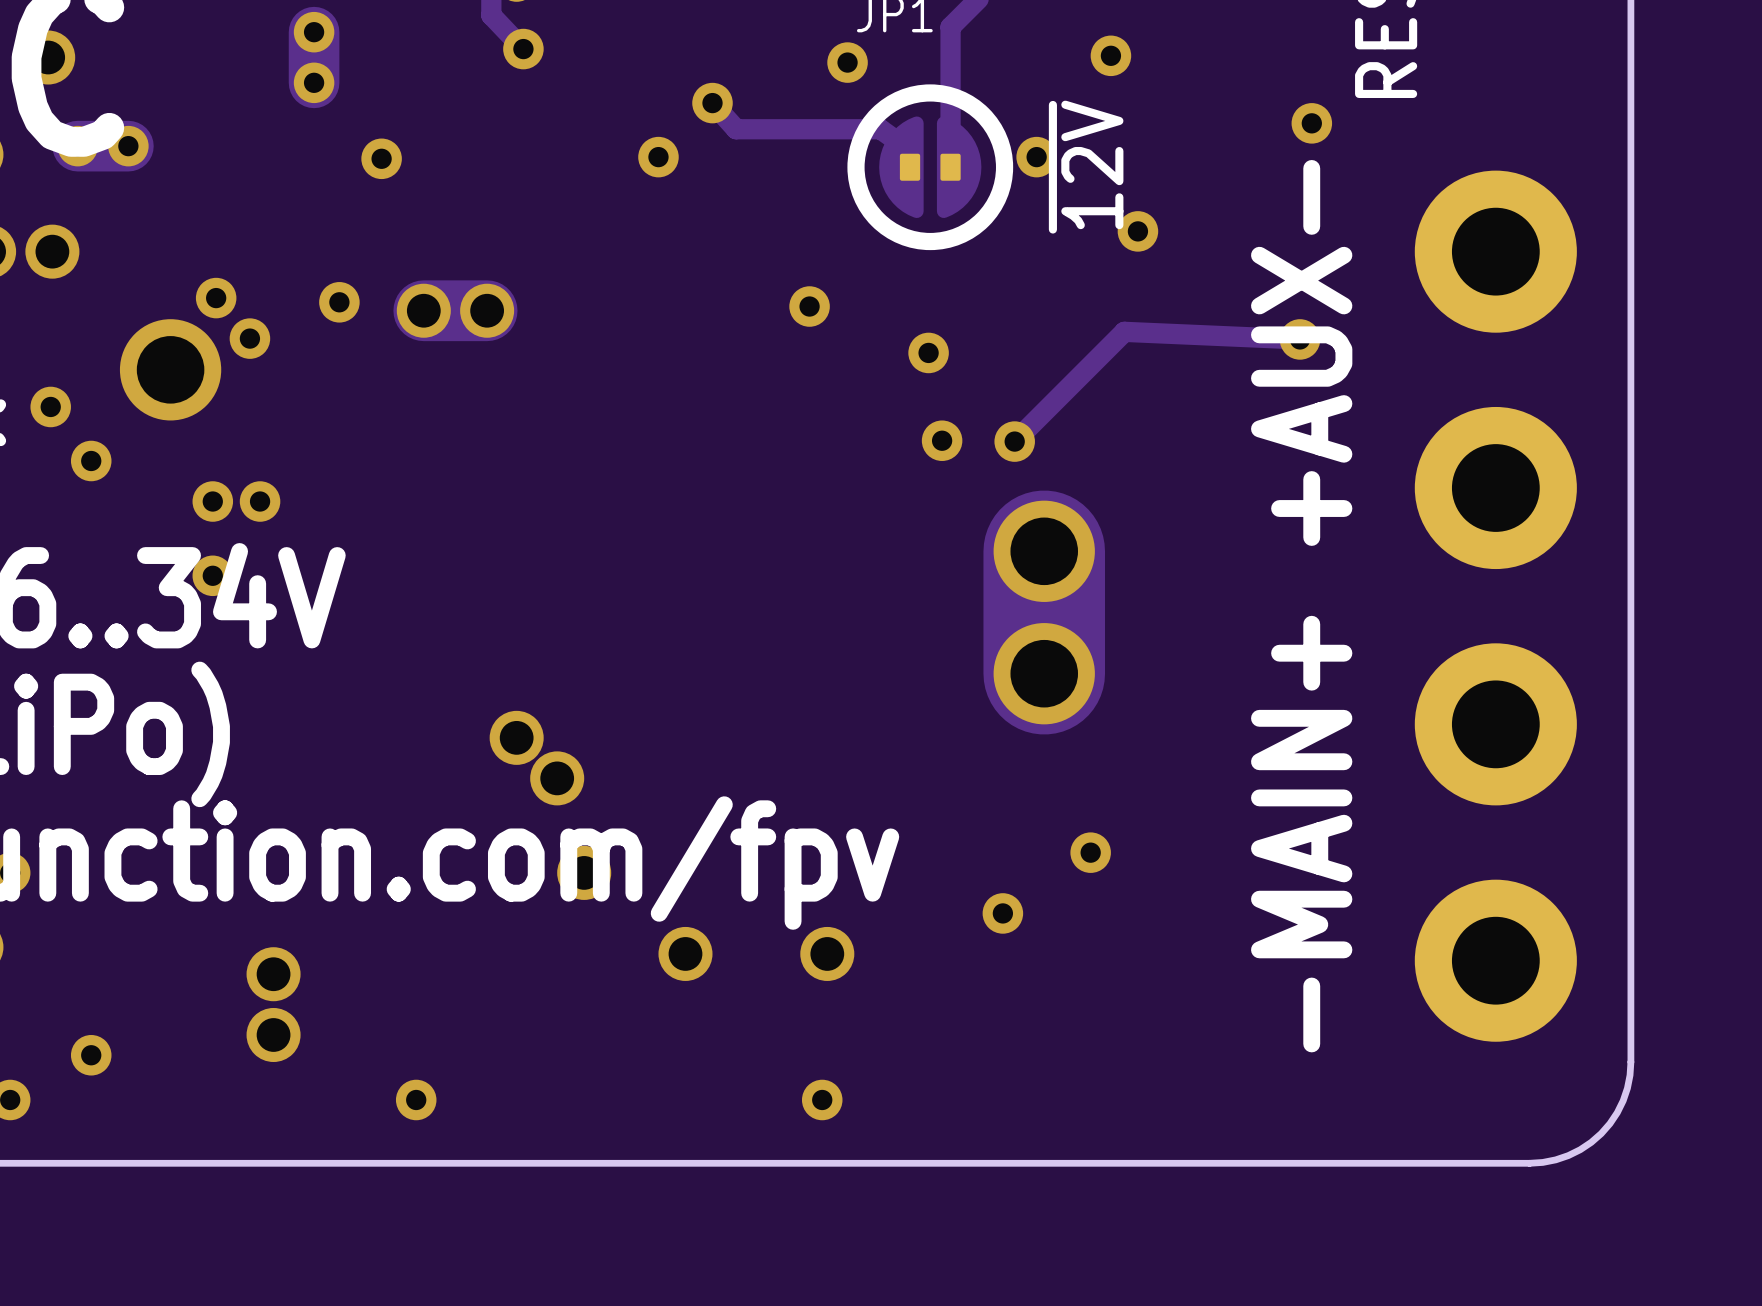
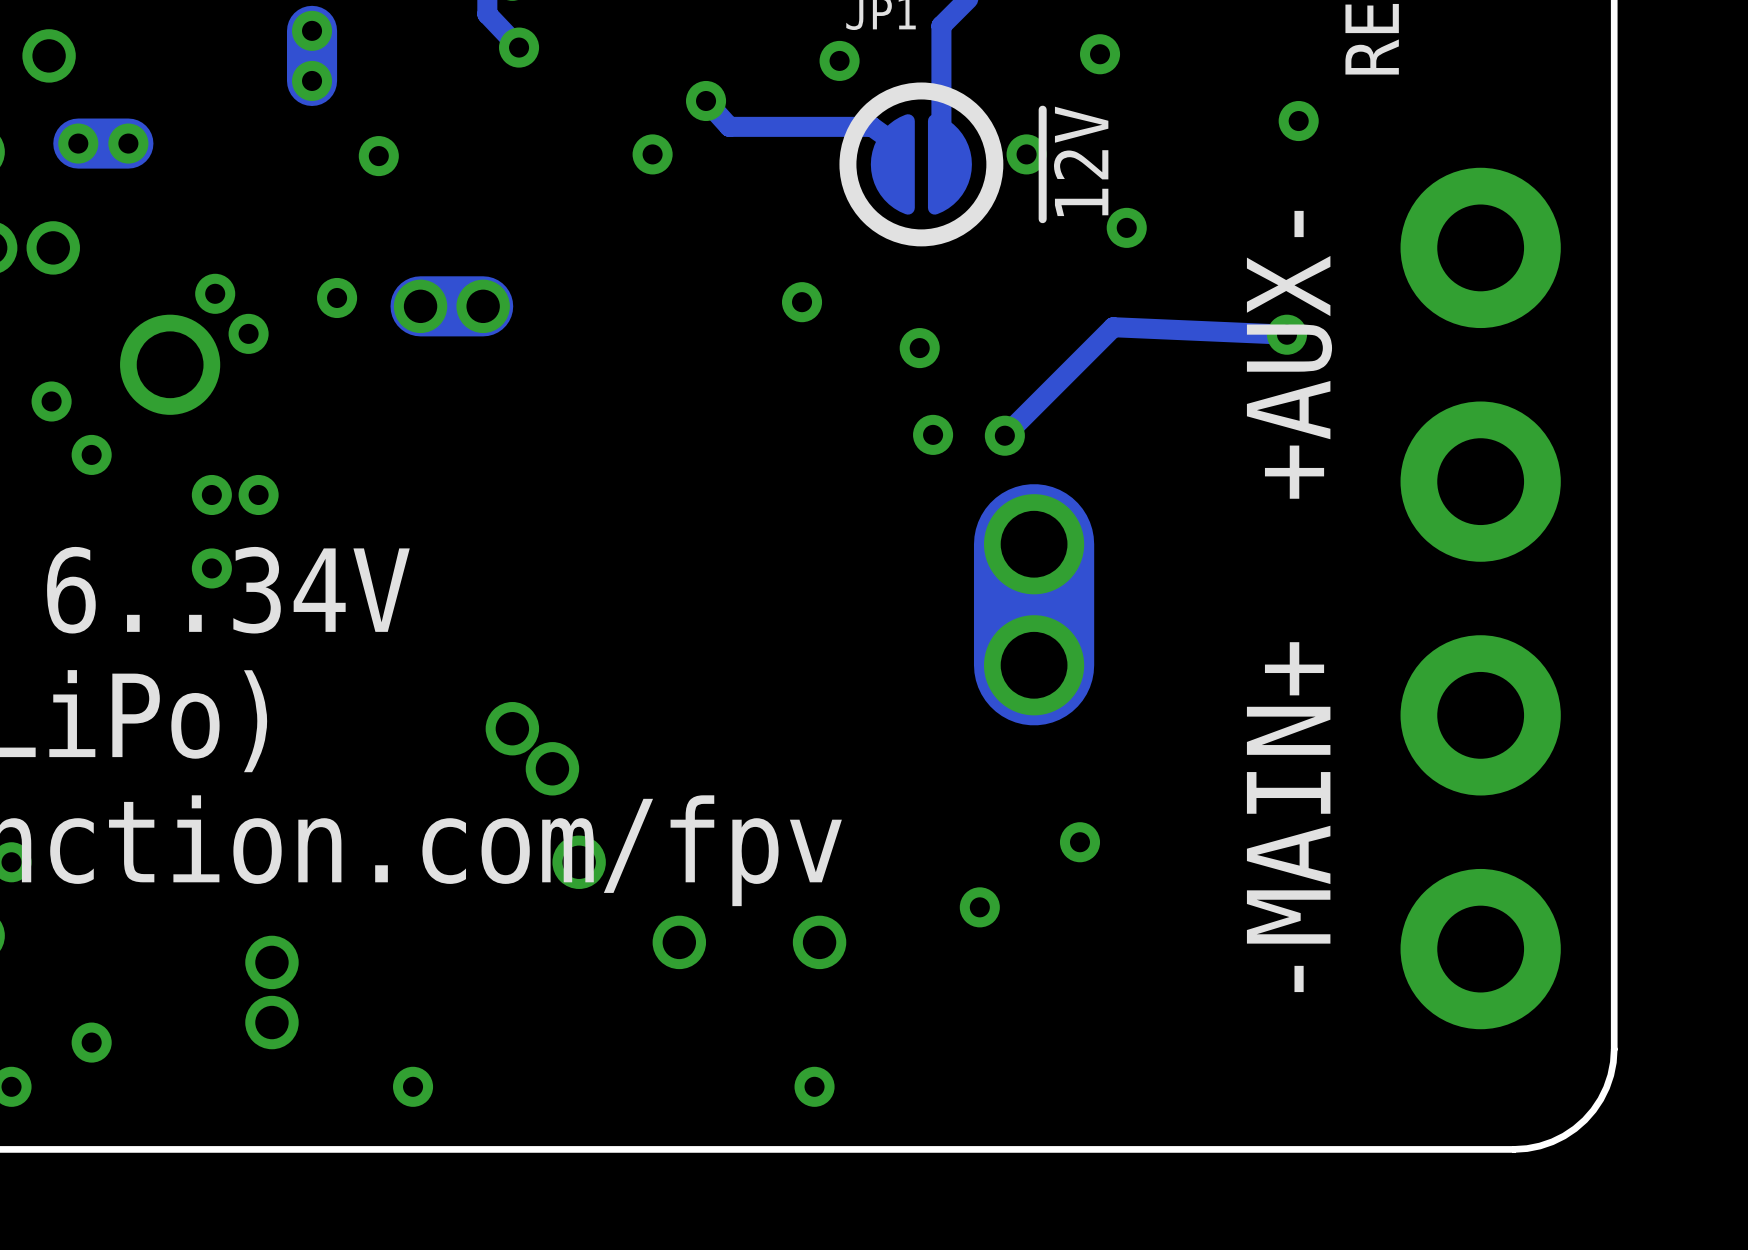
via position: (1002, 913) -> (979, 907)

